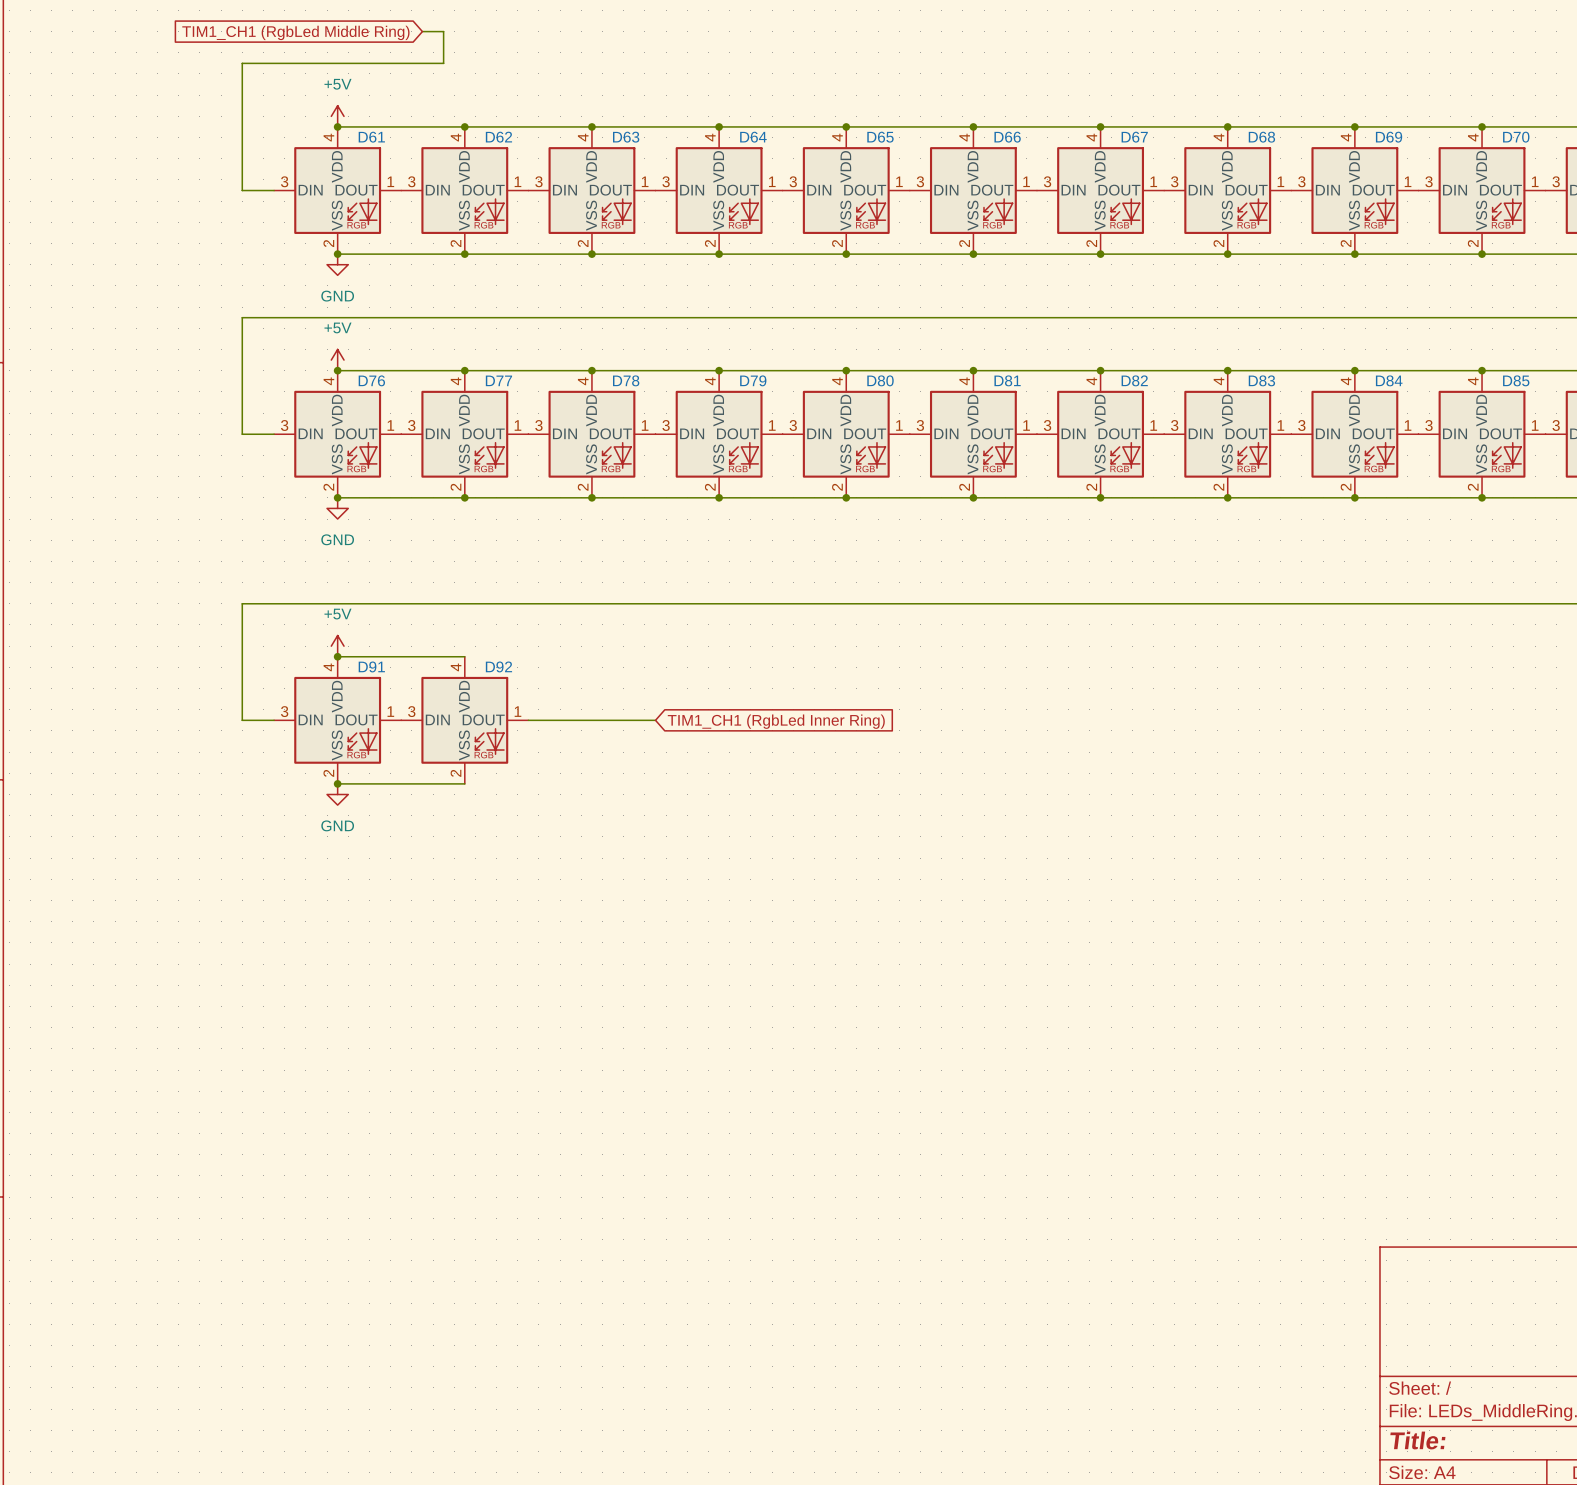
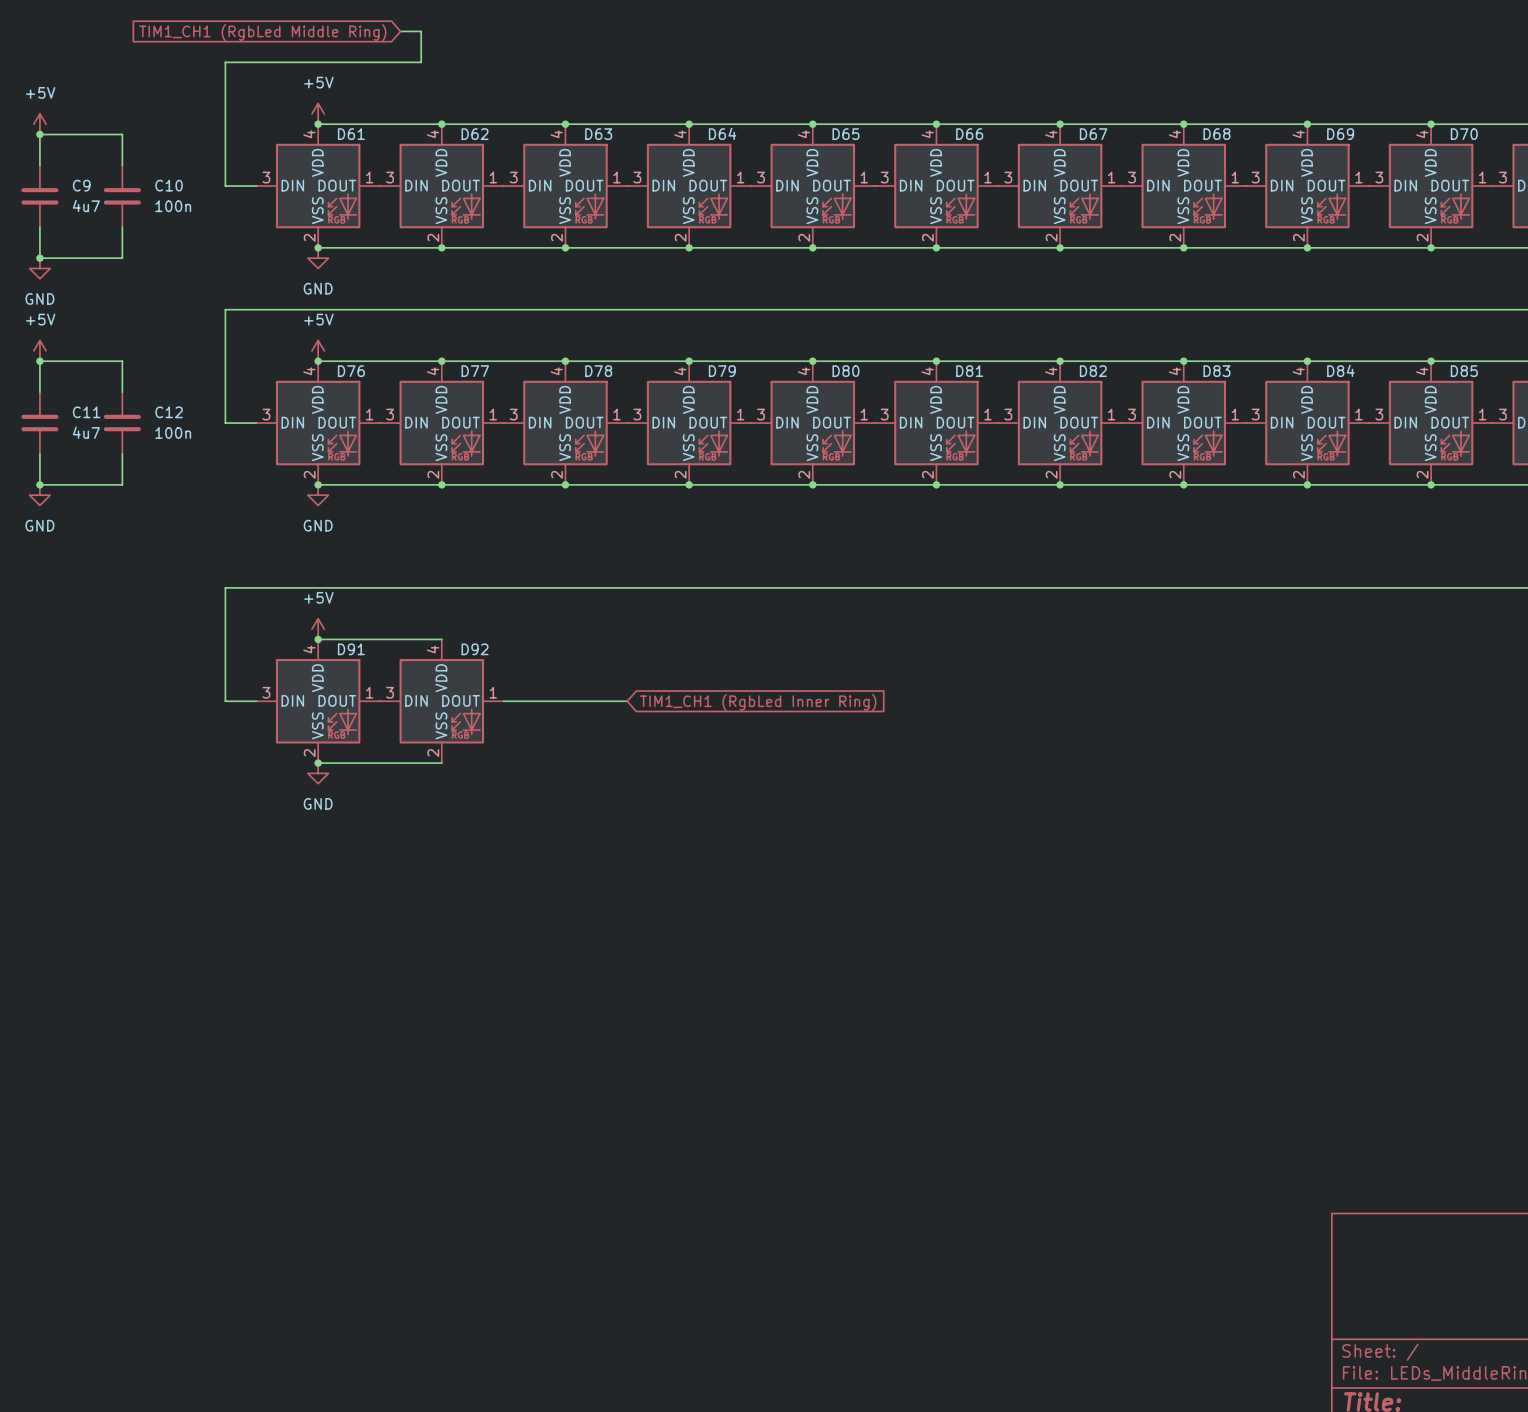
power symbol: none -> +5V (39, 124)
junction: none -> (39, 134)
wire: none -> (39, 165) (39, 134) (122, 134) (122, 165)
C9: none -> 4u7 (39, 196)
C10: none -> 100n (122, 196)
wire: none -> (39, 227) (39, 258) (122, 258) (122, 227)
junction: none -> (39, 258)
power symbol: none -> GND (39, 268)
power symbol: none -> +5V (39, 350)
junction: none -> (39, 361)
wire: none -> (39, 392) (39, 361) (122, 361) (122, 392)
C11: none -> 4u7 (39, 423)
C12: none -> 100n (122, 423)
wire: none -> (39, 453) (39, 484) (122, 484) (122, 453)
junction: none -> (39, 484)
power symbol: none -> GND (39, 495)

